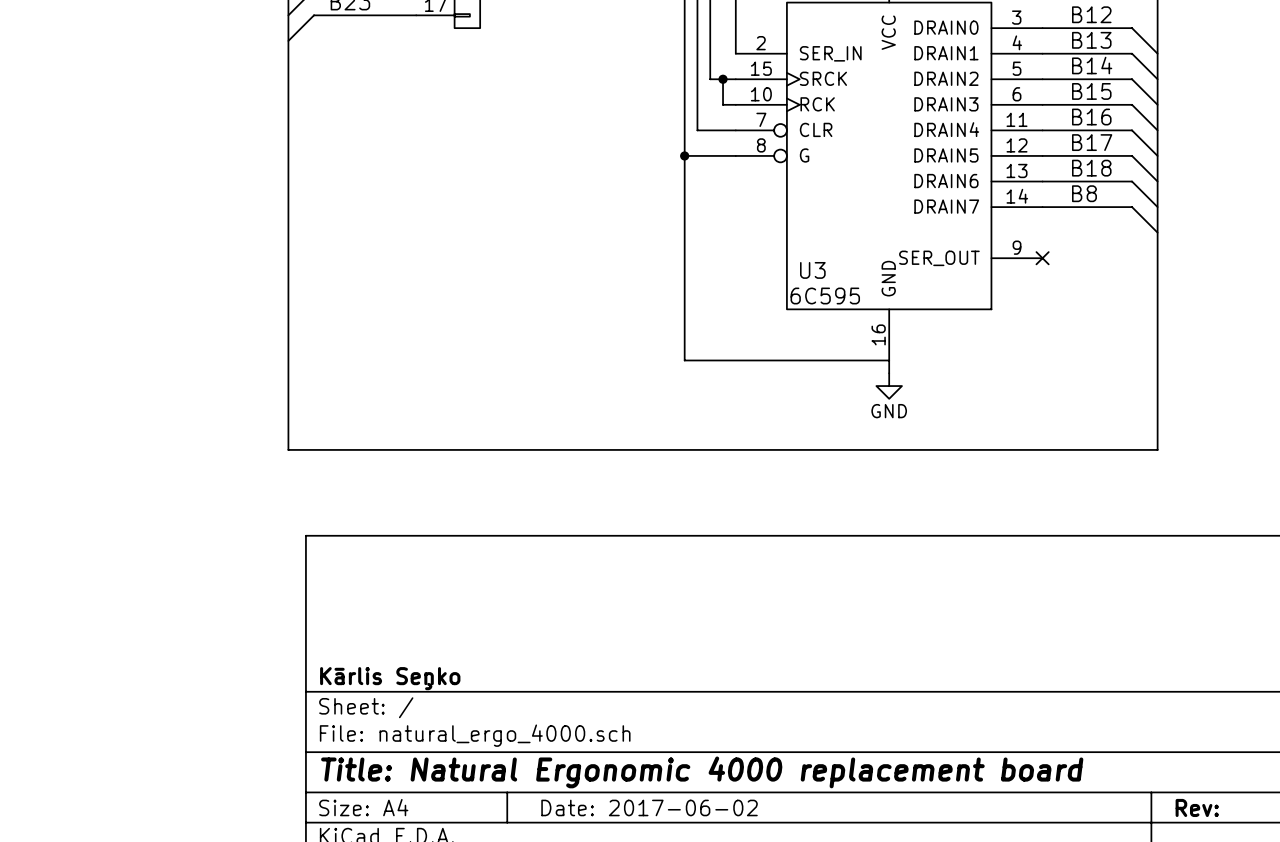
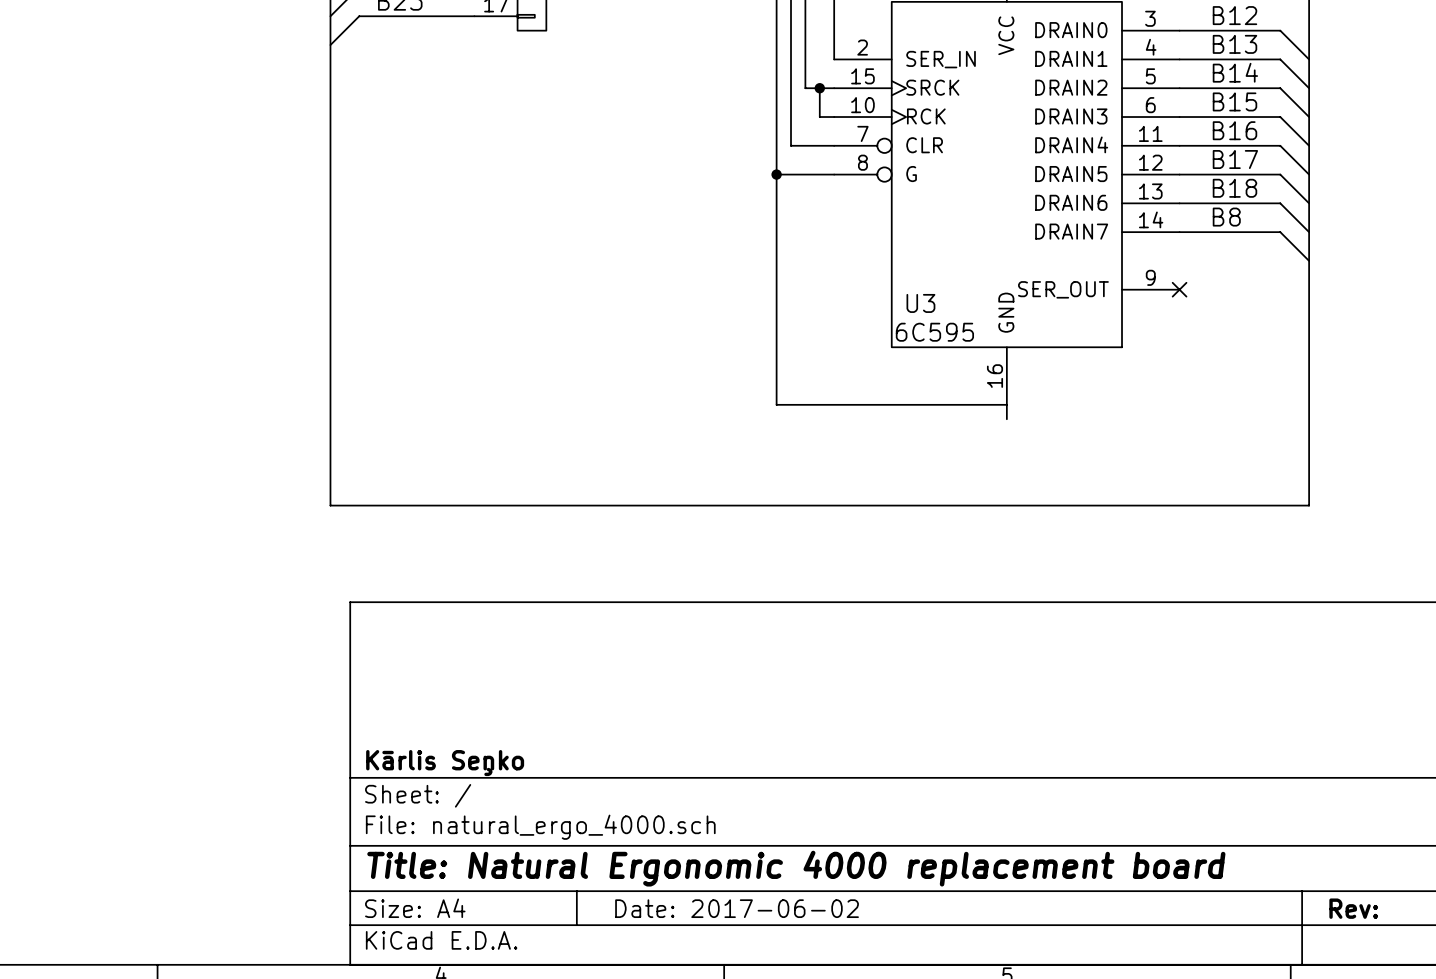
power symbol: GND (889, 386) -> none

